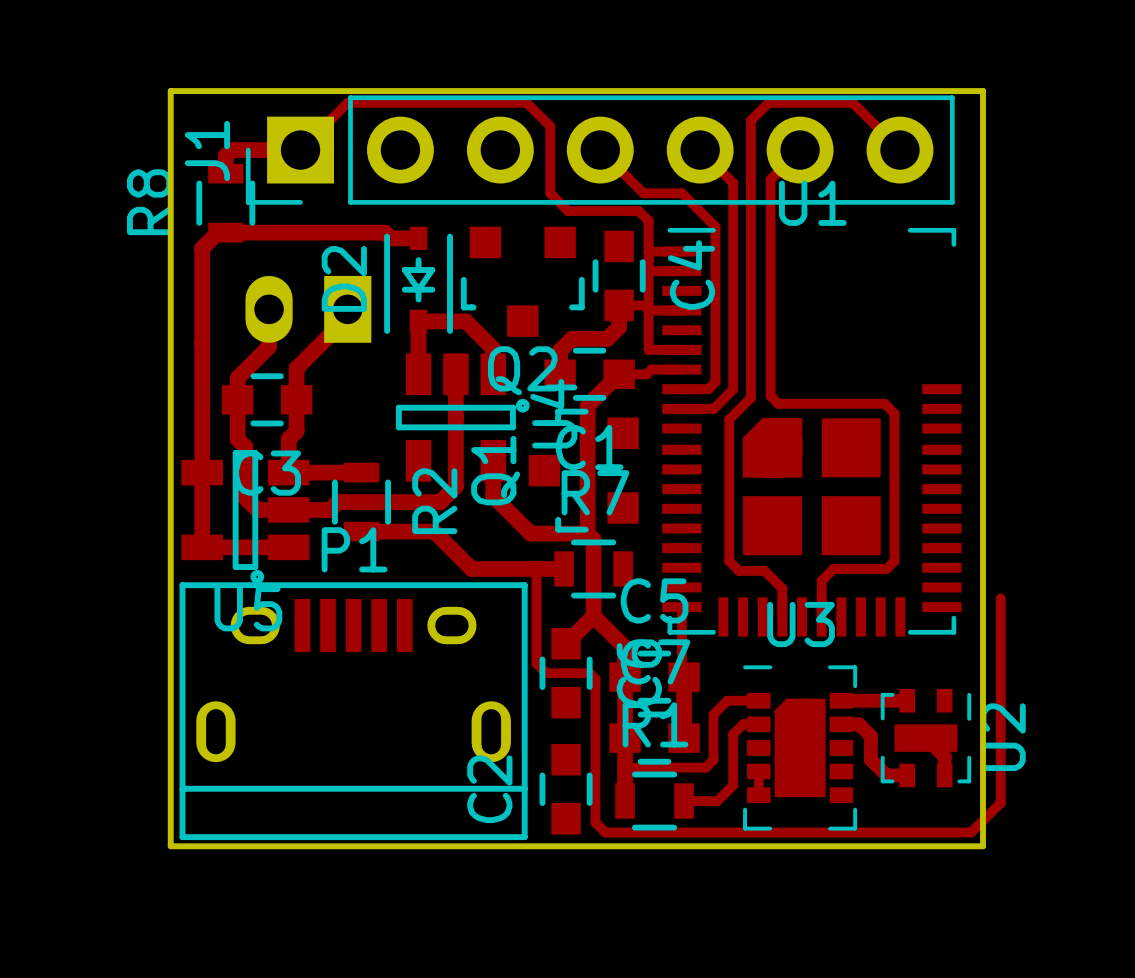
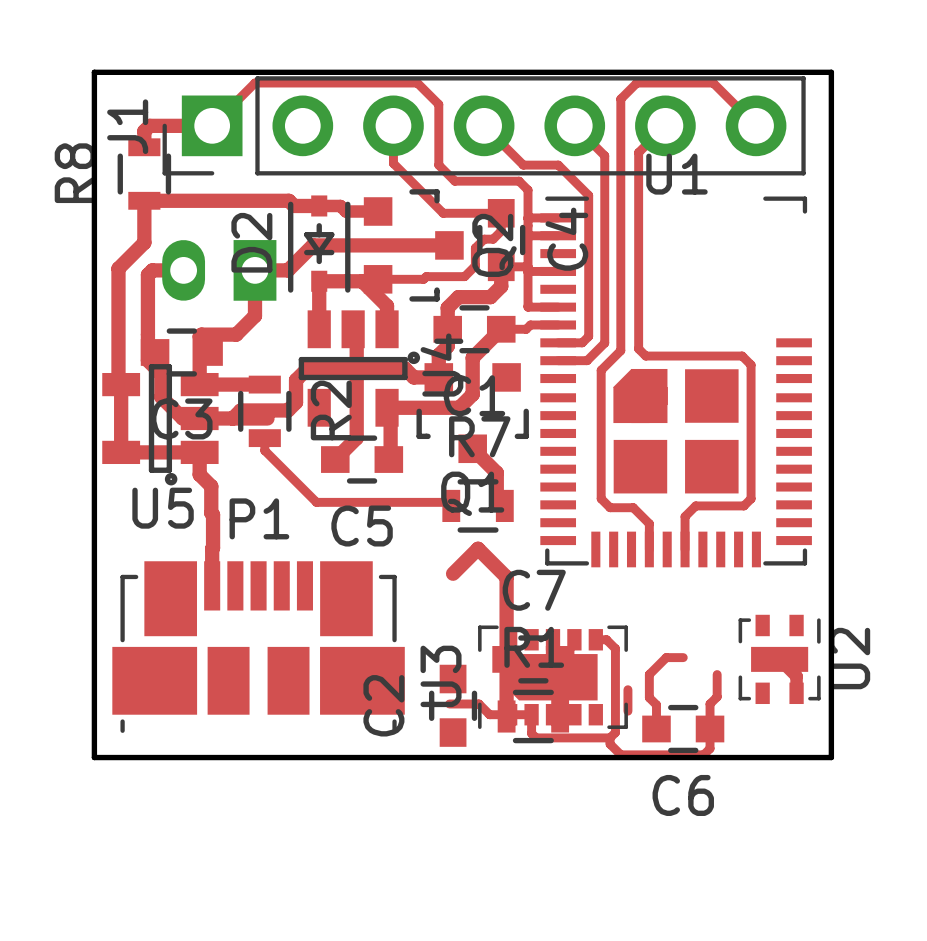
track: none -> (393, 125) (393, 163) (443, 213) (501, 213) (501, 231) (493, 239) (484, 239) (475, 248) (475, 265) (464, 276) (378, 279)
track: (217, 232) (202, 248) (202, 547) (288, 547) -> none
track: none -> (144, 200) (144, 242) (118, 268) (118, 381) (121, 384) (121, 452) (172, 452)
track: none -> (319, 205) (340, 205) (346, 211) (378, 211)
Q2 rotation: 0° (522, 281) -> 90° counterclockwise (413, 245)
track: none -> (449, 245) (312, 245) (288, 270) (254, 270)
track: (269, 309) (269, 346) (237, 378) (237, 439) (245, 447) (245, 498) (257, 509) -> (183, 270) (152, 270) (147, 274) (147, 360) (161, 373) (161, 397) (182, 418) (201, 418)
track: (347, 317) (296, 368) (296, 431) (288, 439) (288, 472) -> (254, 277) (254, 315) (236, 334) (201, 334) (199, 336) (199, 384) (264, 384)
track: (455, 374) (455, 486) (440, 502) (337, 502) (330, 509) (286, 509) -> (212, 585) (213, 514) (211, 513) (211, 486) (199, 474) (199, 452)
track: none -> (356, 329) (356, 438) (335, 459)
track: none -> (447, 329) (447, 346) (438, 355) (438, 377) (413, 377) (404, 368) (307, 368) (296, 380) (296, 402) (288, 410) (240, 410) (232, 418)
track: (587, 446) (587, 533) -> (472, 394) (459, 407) (390, 407) (390, 457) (388, 459)
track: (493, 460) (493, 496) (530, 533) (587, 533) -> none
Q1 rotation: 0° (583, 470) -> 90° counterclockwise (472, 413)
track: none -> (264, 438) (264, 450) (316, 502) (443, 502)
R2 position: (361, 502) -> (264, 411)
track: none -> (472, 448) (496, 472) (496, 502)
U5 position: (245, 516) -> (160, 424)
track: (361, 531) (434, 531) (471, 568) (564, 568) -> none
track: (587, 533) (593, 539) (593, 616) -> none
track: (536, 568) (536, 663) (546, 673) (589, 673) (595, 679) (595, 822) (605, 832) (971, 832) (1000, 803) (1000, 598) -> none
P1 footprint: [179, 582, 528, 841] -> [112, 561, 405, 733]
C5 name position: C5 (654, 600) -> C5 (362, 526)
track: (681, 607) (684, 738) -> none
C6 rotation: 0° (566, 673) -> 90° clockwise (683, 728)
C6 position: (566, 673) -> (683, 728)
C5 position: (654, 677) -> (362, 459)
track: (758, 700) (727, 700) (713, 714) (713, 759) (705, 767) (625, 767) (627, 769) (625, 769) -> none
track: (841, 700) (907, 700) -> none
track: none -> (595, 639) (606, 639) (615, 648) (615, 732) (610, 737)
track: (758, 724) (743, 724) (733, 734) (733, 785) (717, 801) (684, 801) (684, 810) -> none
track: (841, 724) (859, 724) (870, 736) (870, 759) (886, 775) (907, 775) -> none
track: none -> (683, 657) (666, 657) (649, 674) (649, 697) (656, 704) (656, 728)
U3 rotation: 0° (800, 747) -> 90° counterclockwise (552, 677)
U3 position: (800, 747) -> (552, 677)
track: none -> (717, 674) (717, 696) (710, 704) (710, 748) (703, 754) (620, 754) (610, 744) (610, 737)
track: none -> (449, 704) (478, 704) (489, 714) (531, 714) (531, 733) (536, 737) (610, 737)

